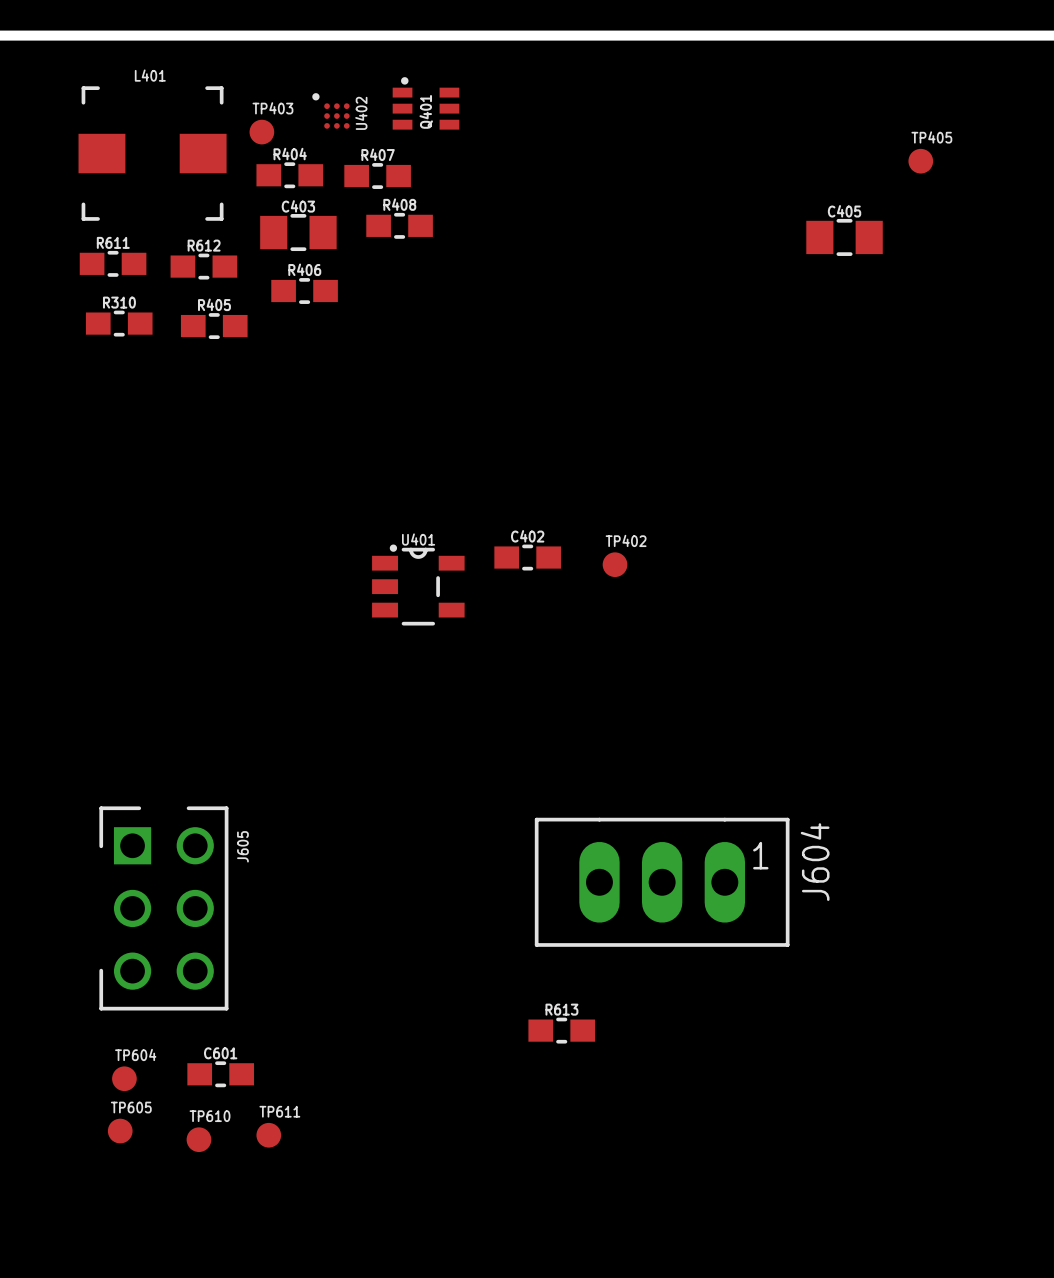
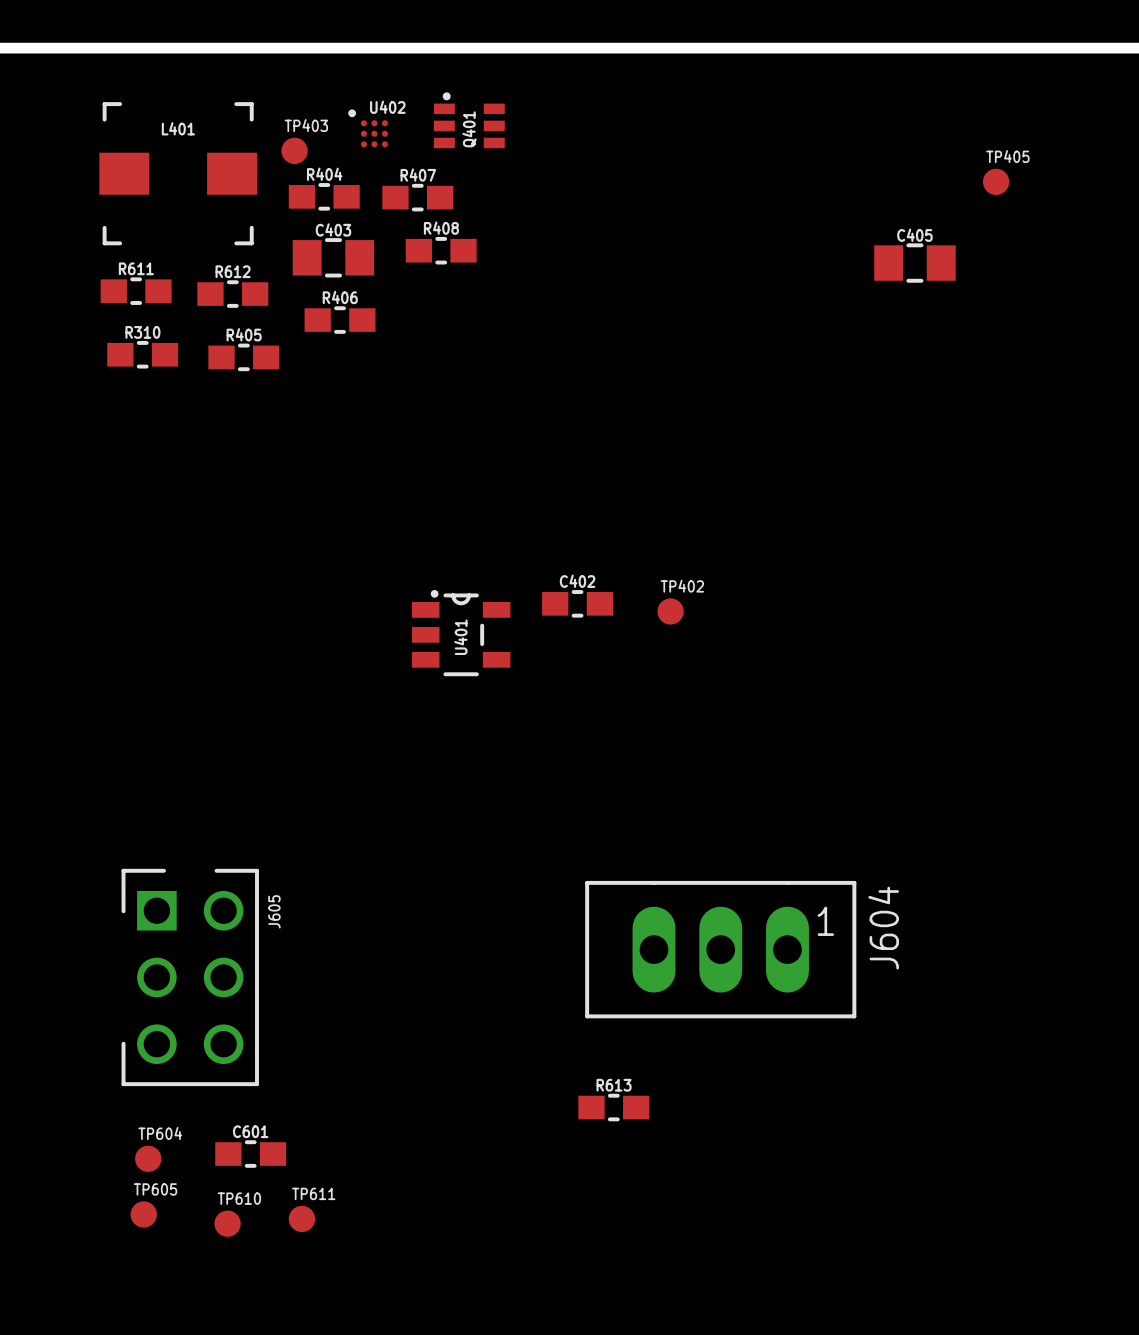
L401 name position: L401 (150, 75) -> L401 (178, 128)
U402 name rotation: 0° (361, 113) -> 90° clockwise (387, 107)
U401 name rotation: 0° (418, 539) -> 90° counterclockwise (460, 637)
U401 name position: U401 (418, 539) -> U401 (460, 637)

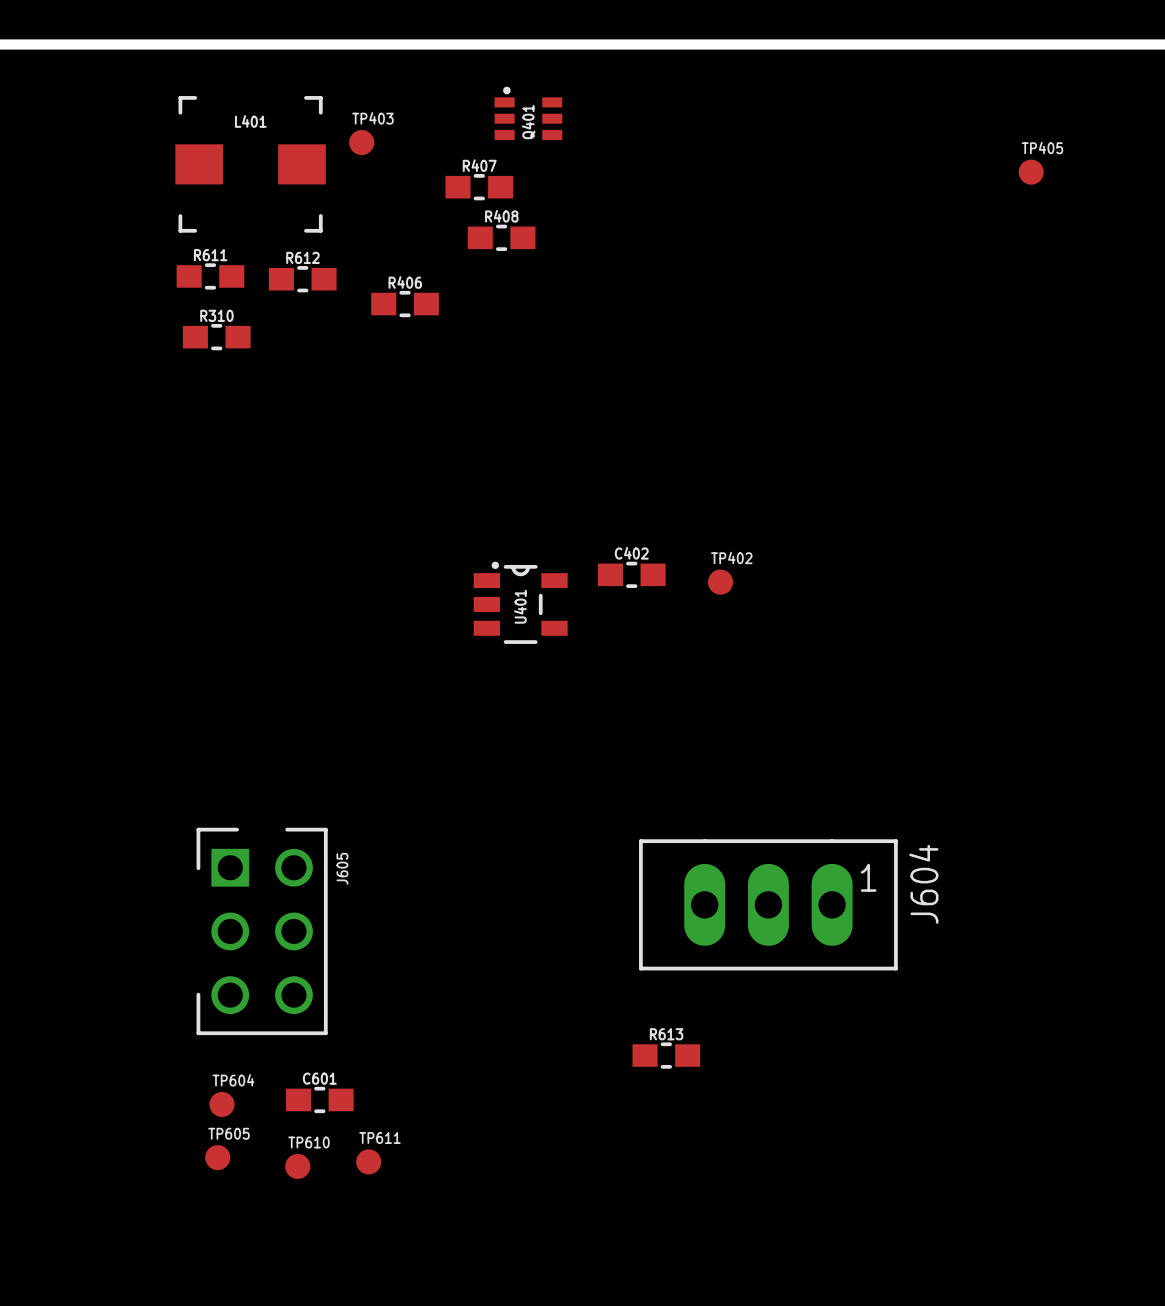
U402: (368, 128) -> none
R404: (324, 196) -> none
C403: (333, 257) -> none
C405: (914, 263) -> none
R405: (243, 357) -> none

